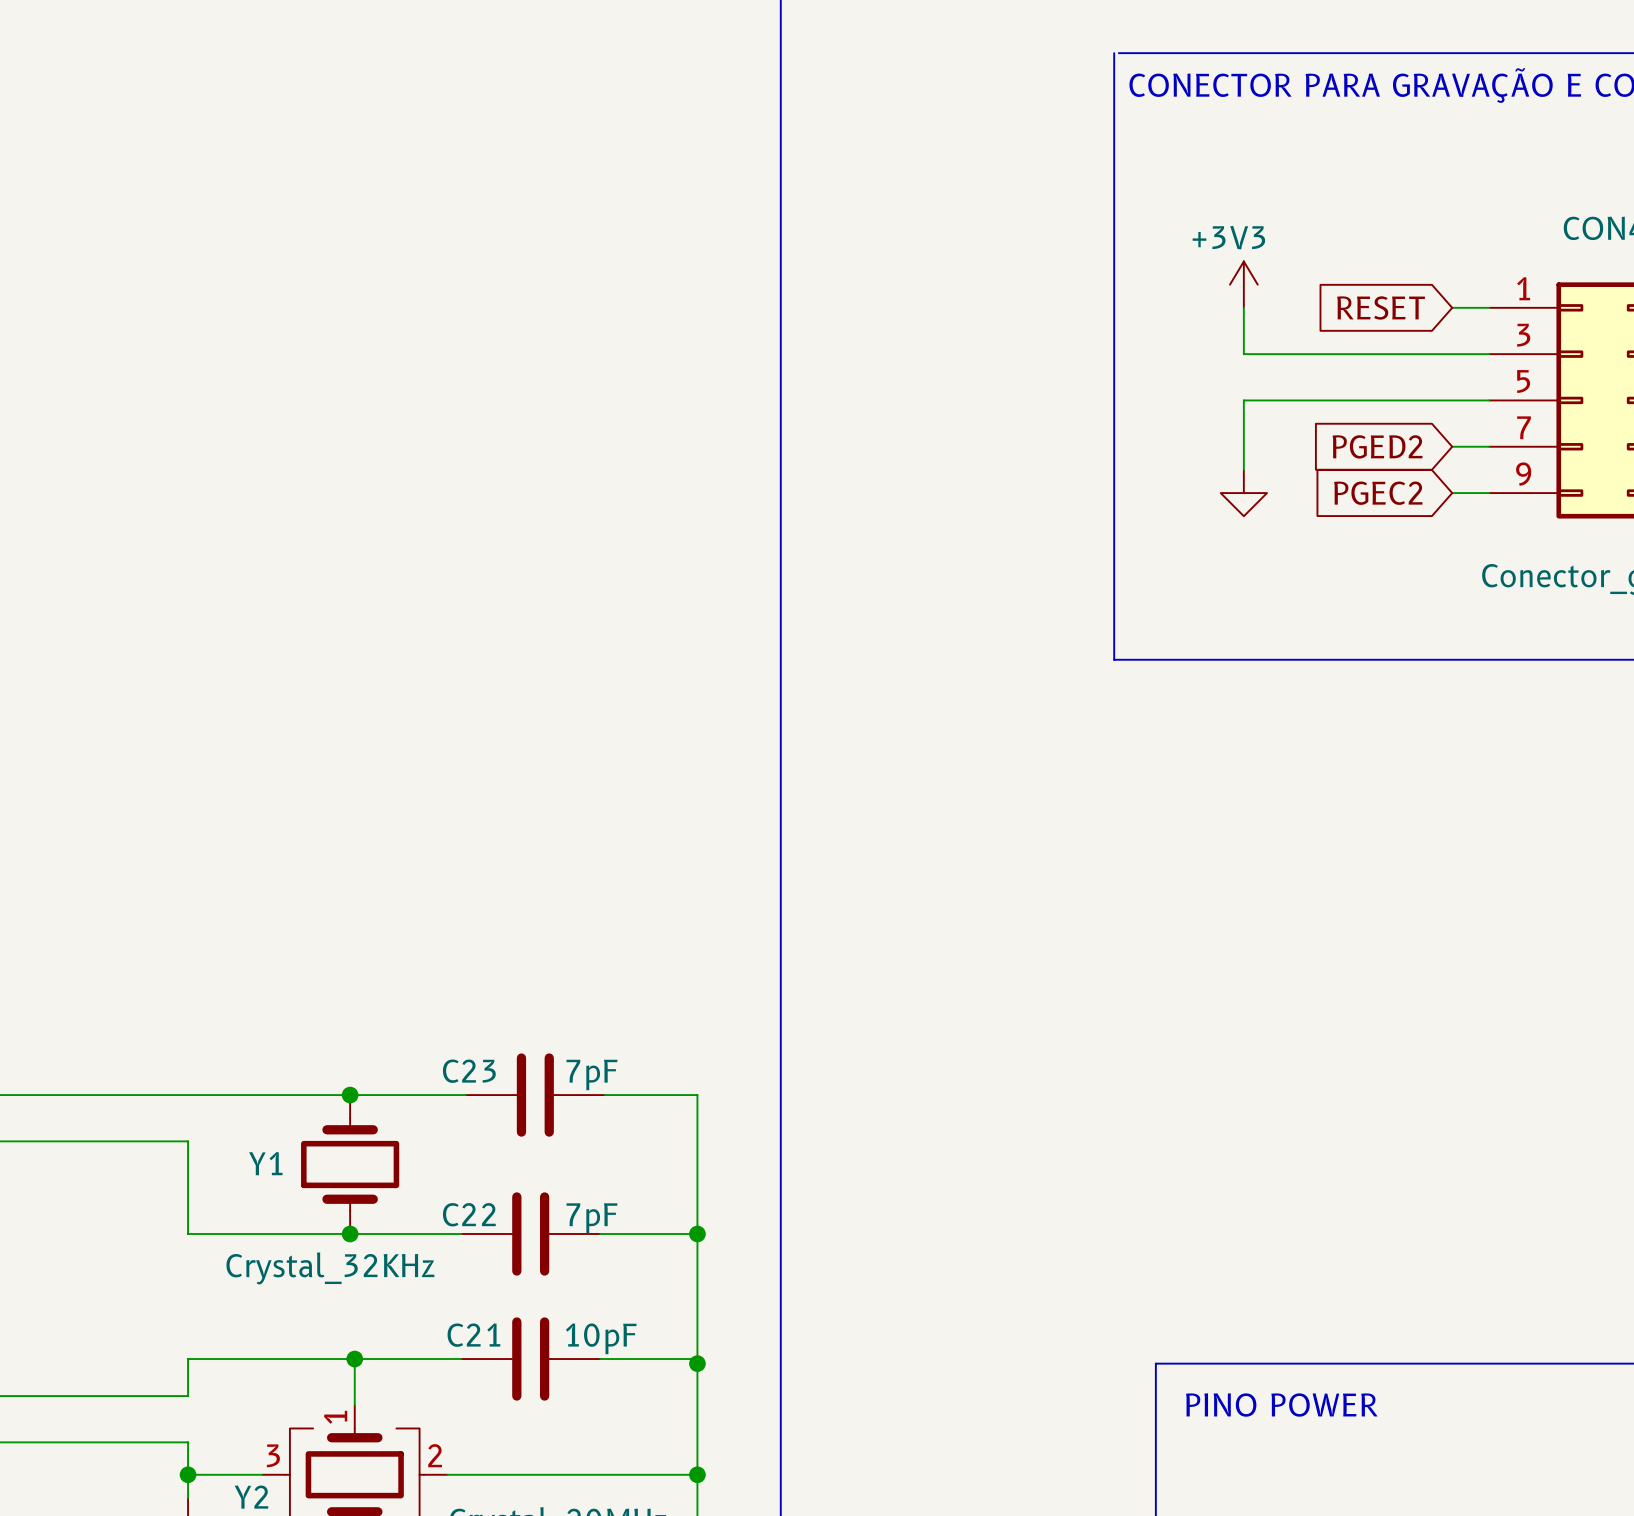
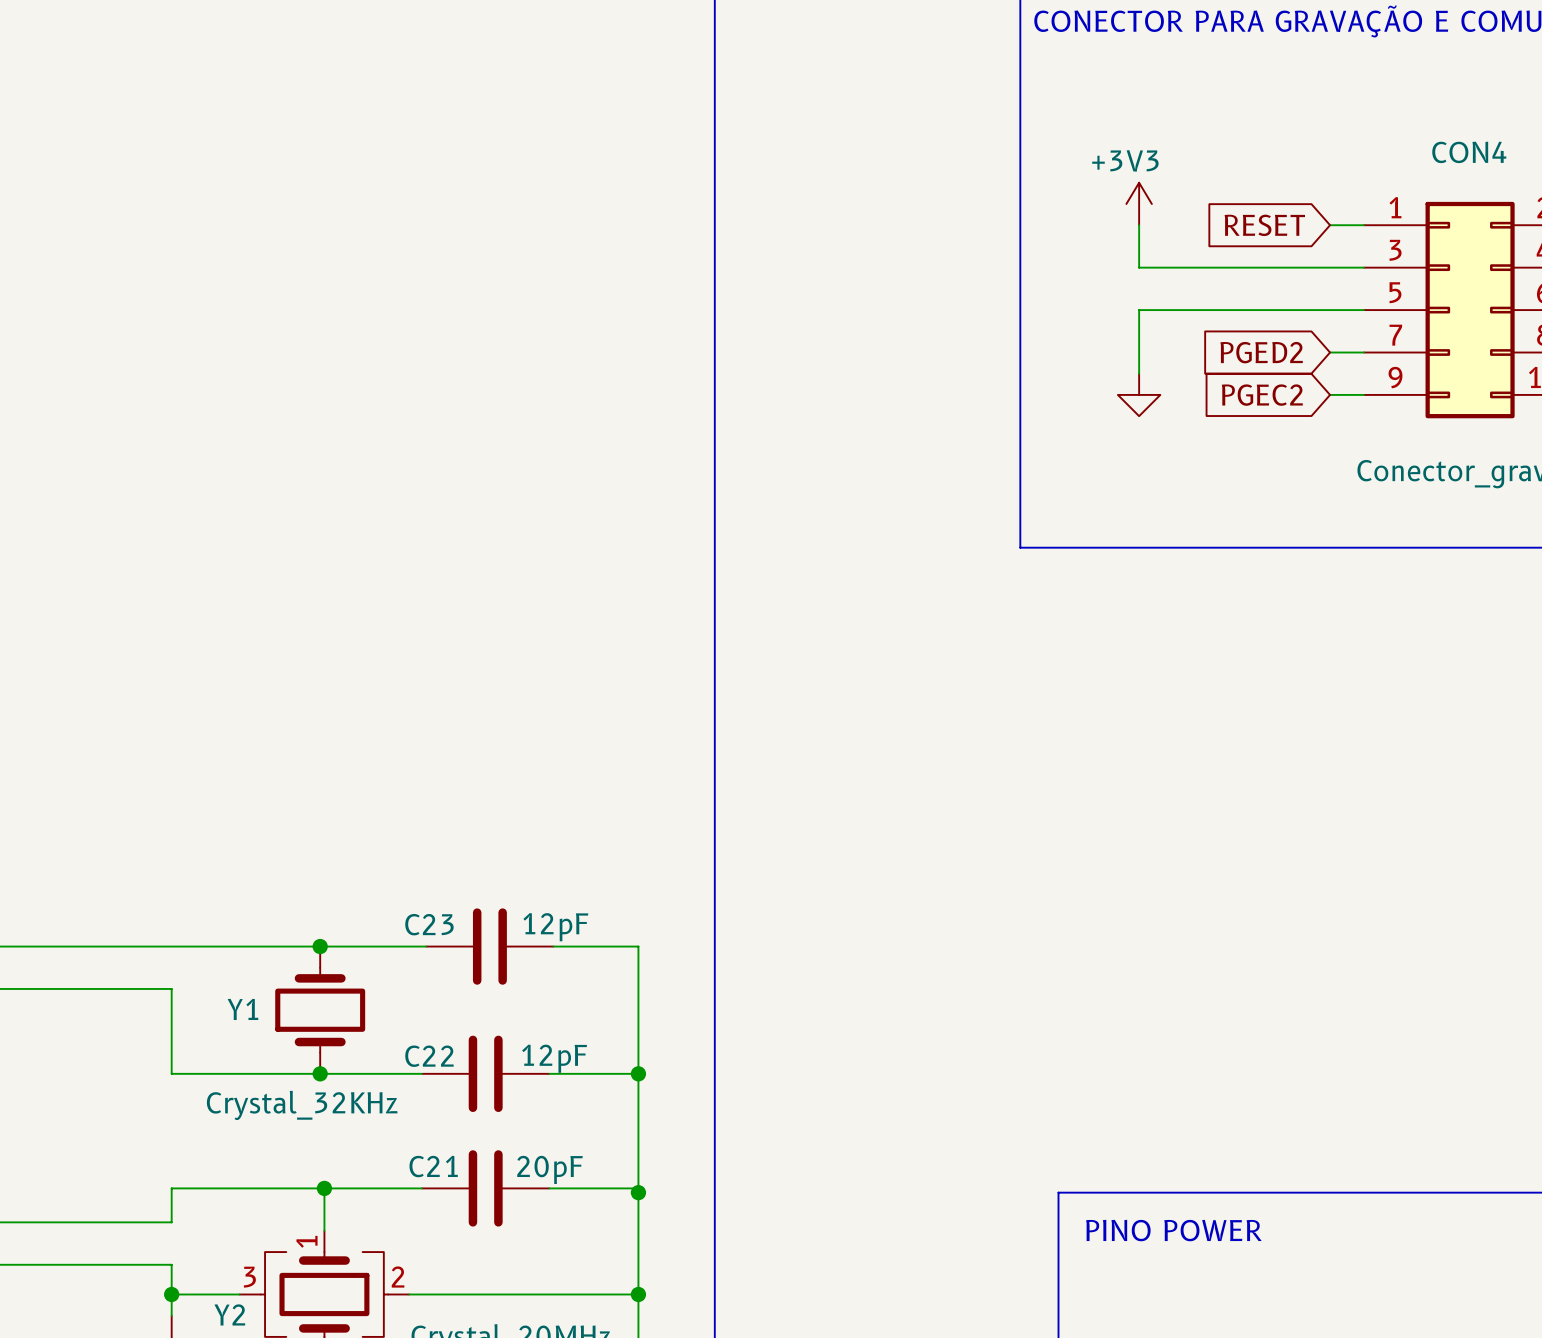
C23 value: 7pF (592, 1075) -> 12pF (555, 927)
C22 value: 7pF (592, 1218) -> 12pF (554, 1058)
C21 value: 10pF (601, 1338) -> 20pF (550, 1169)

